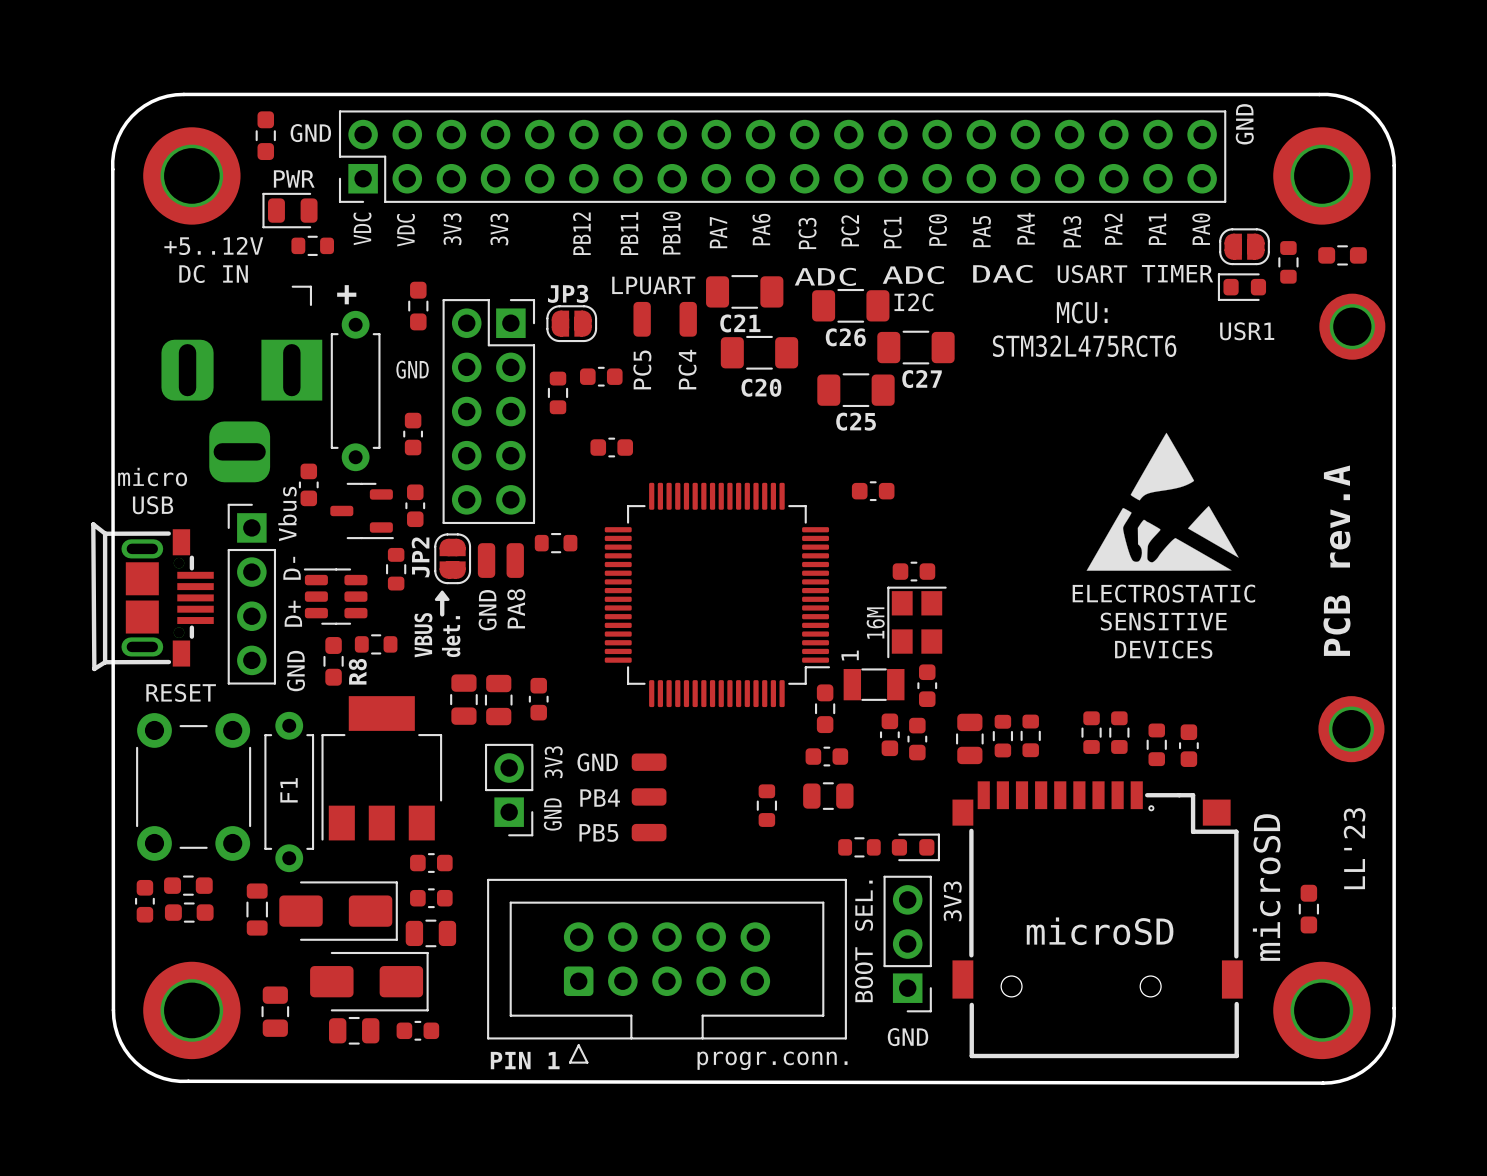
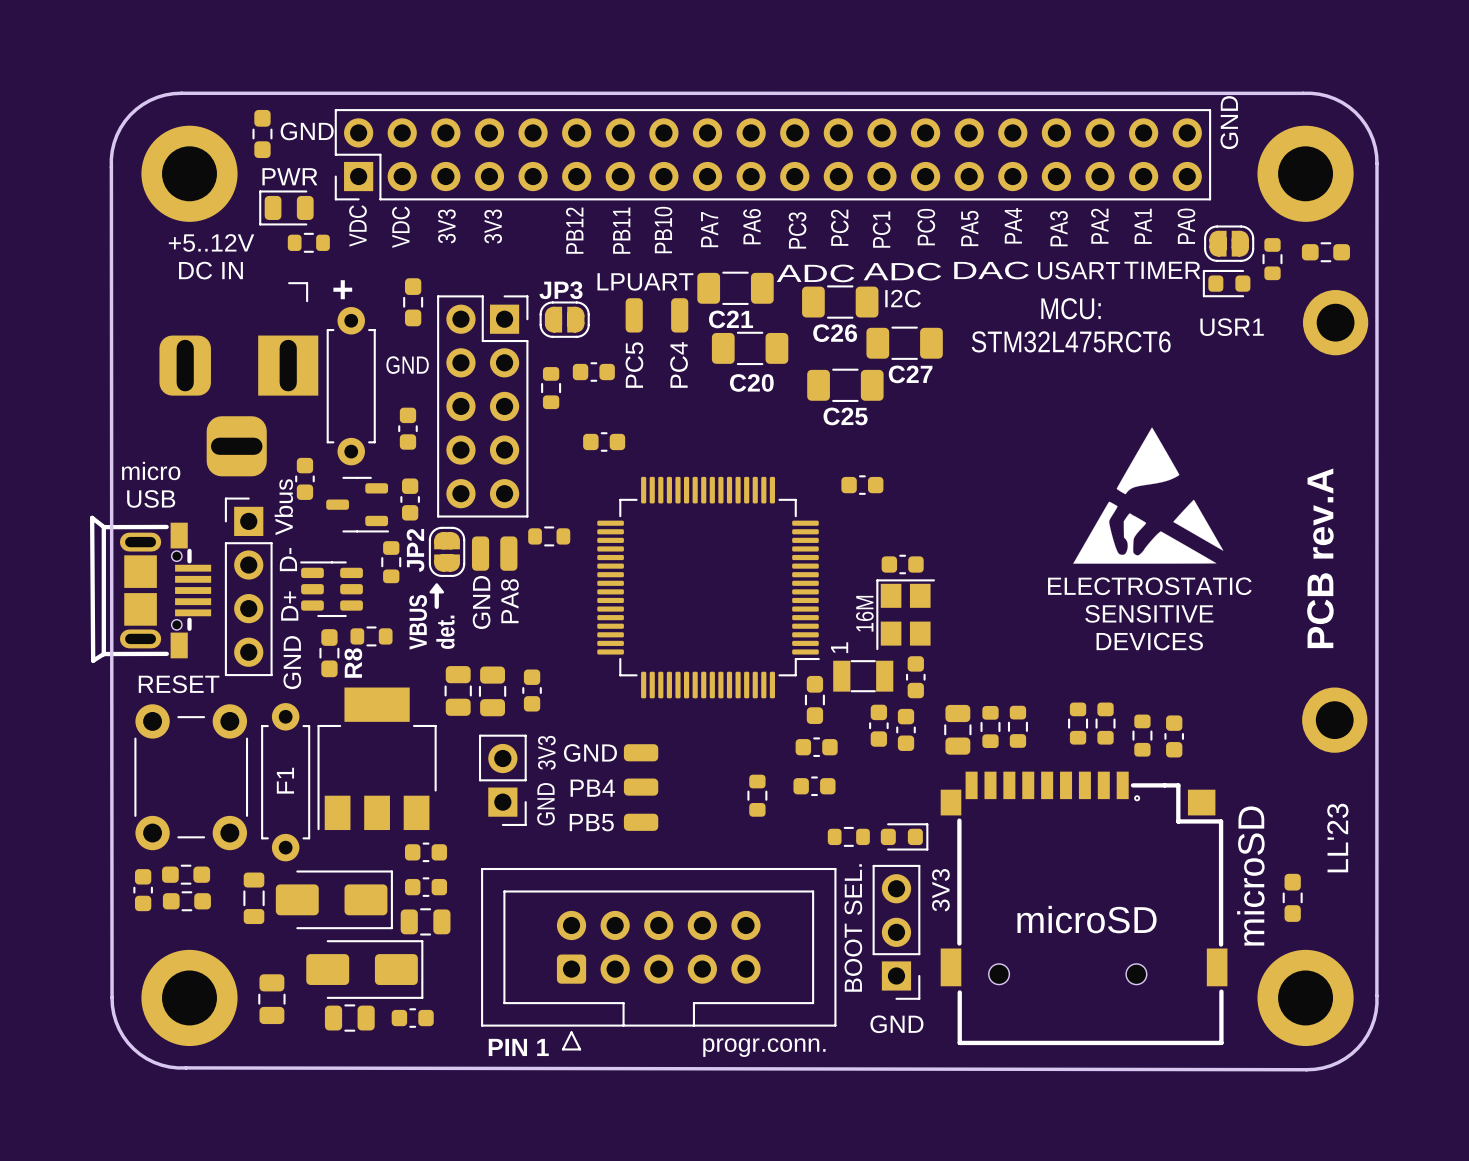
part footprint: [91, 522, 214, 672] -> [90, 515, 212, 663]
part footprint: [803, 782, 854, 810] -> [793, 776, 836, 797]

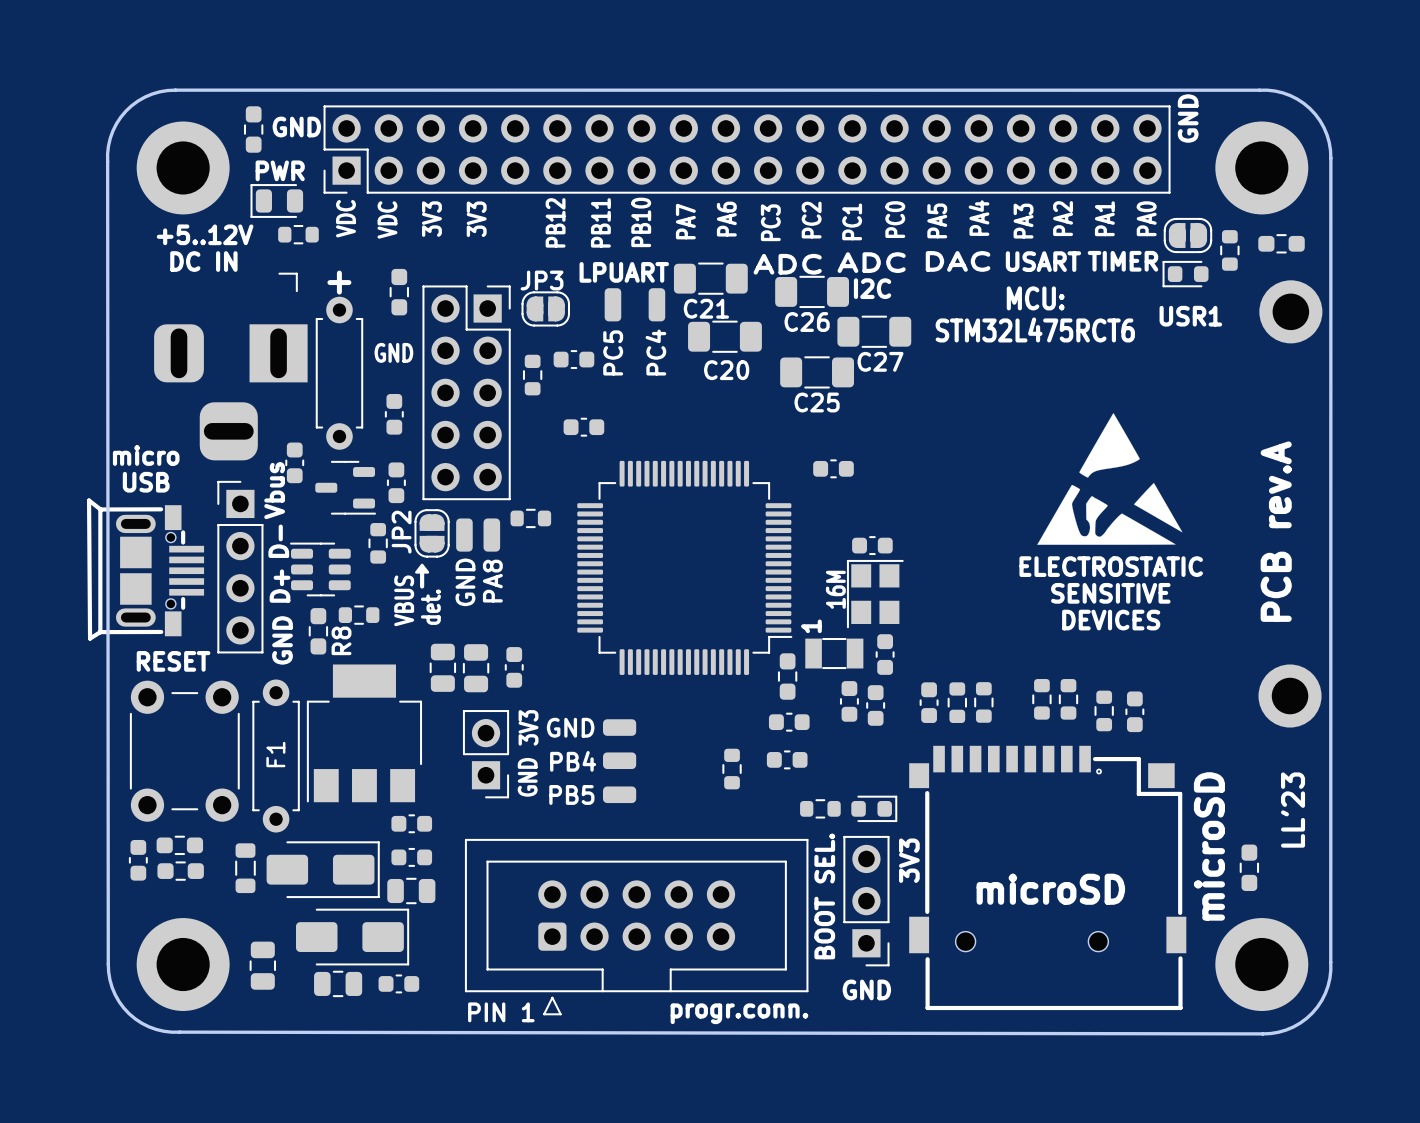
part footprint: [944, 704, 972, 755] -> [919, 682, 939, 723]

